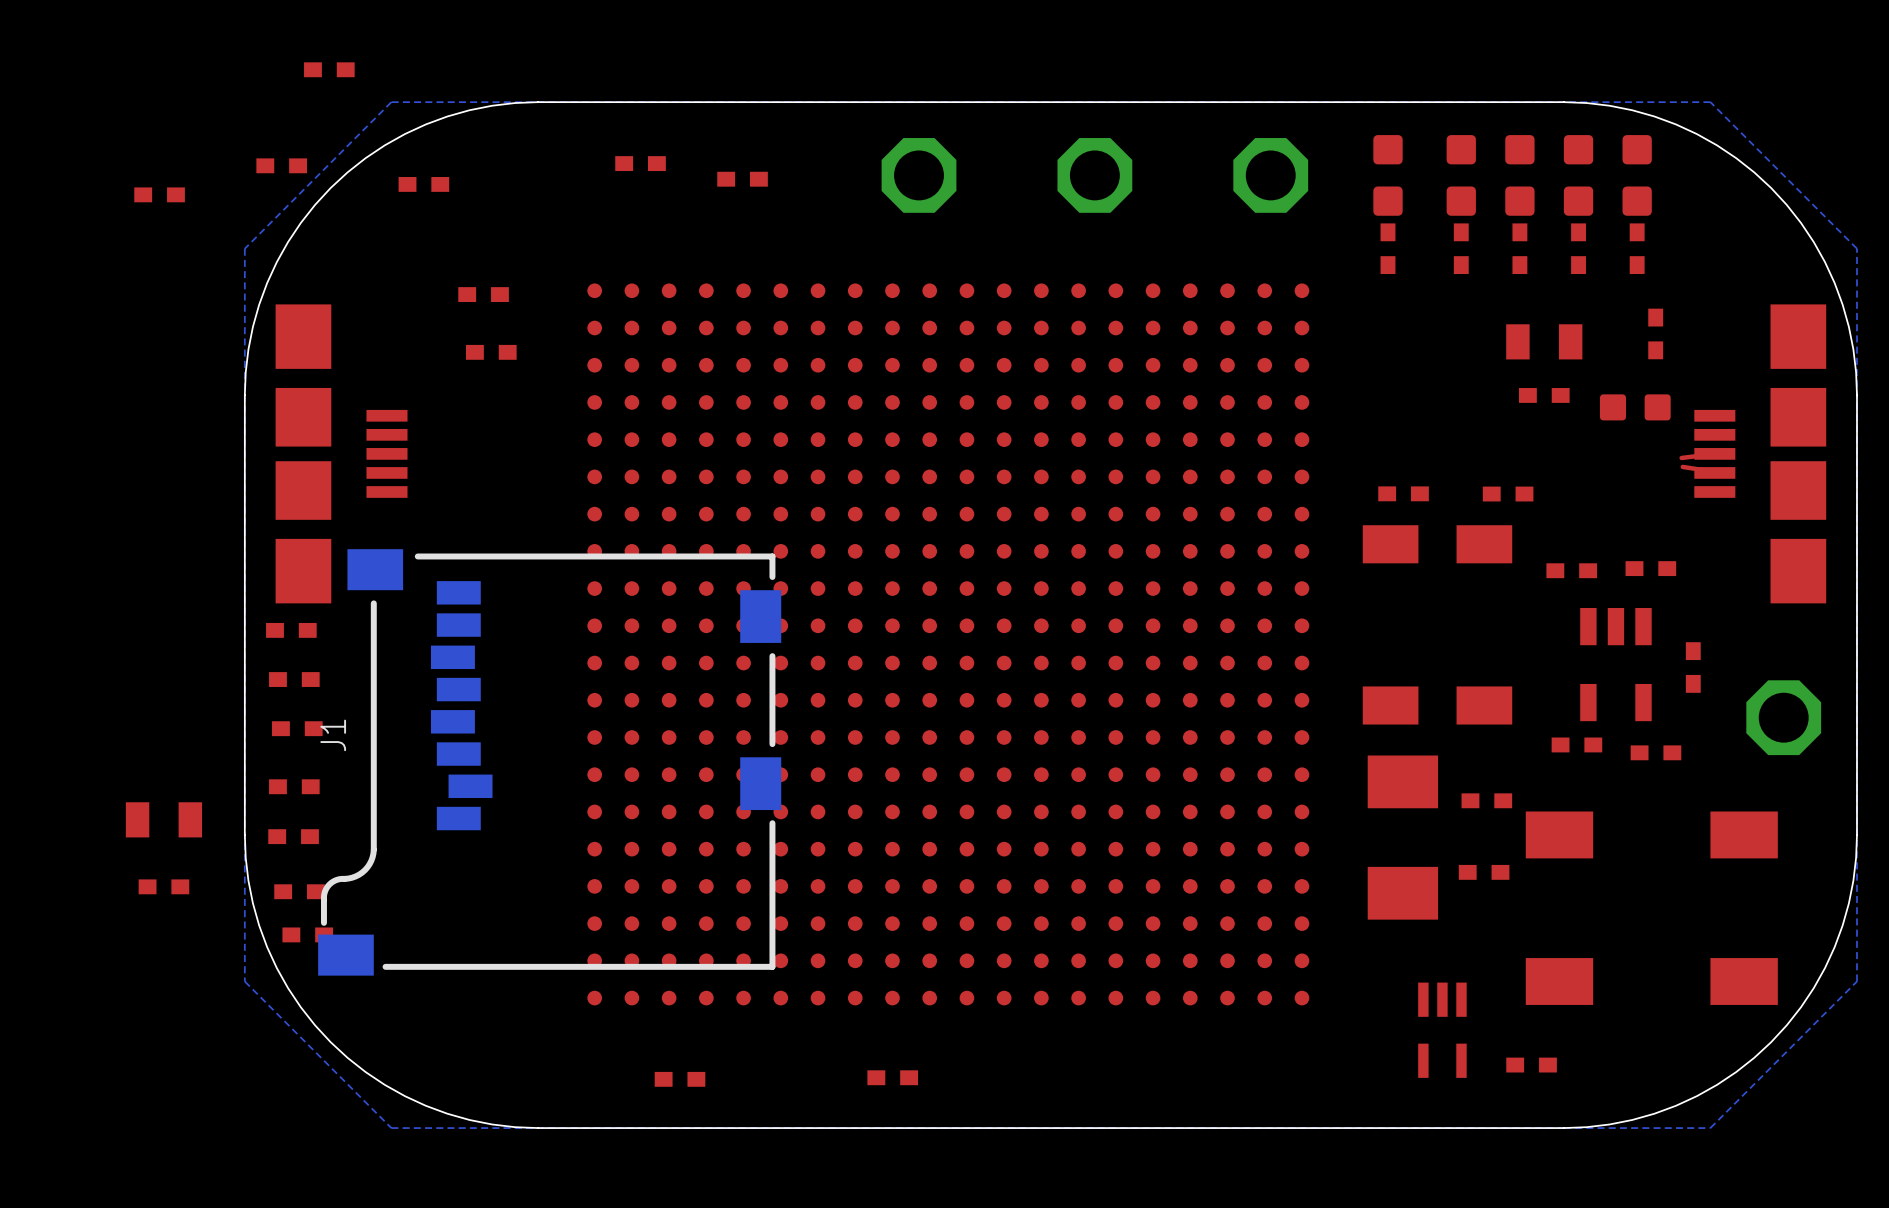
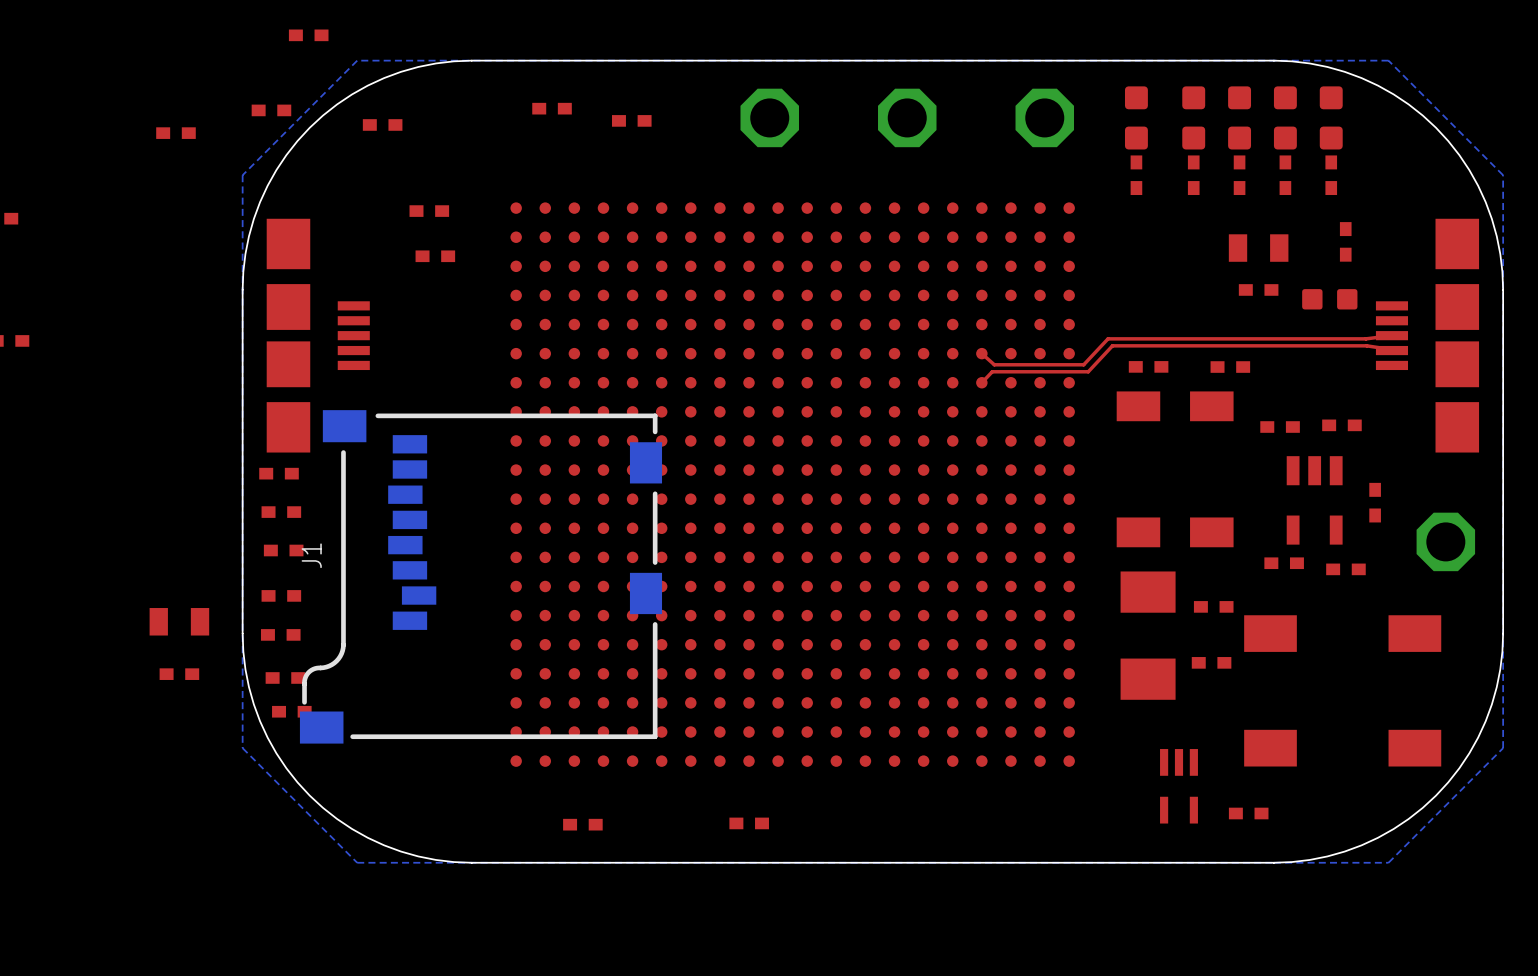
top track: none -> (1366, 338) (1108, 338) (1083, 364) (994, 364) (981, 353)
top track: none -> (1366, 345) (1112, 345) (1088, 371) (992, 371) (981, 382)

